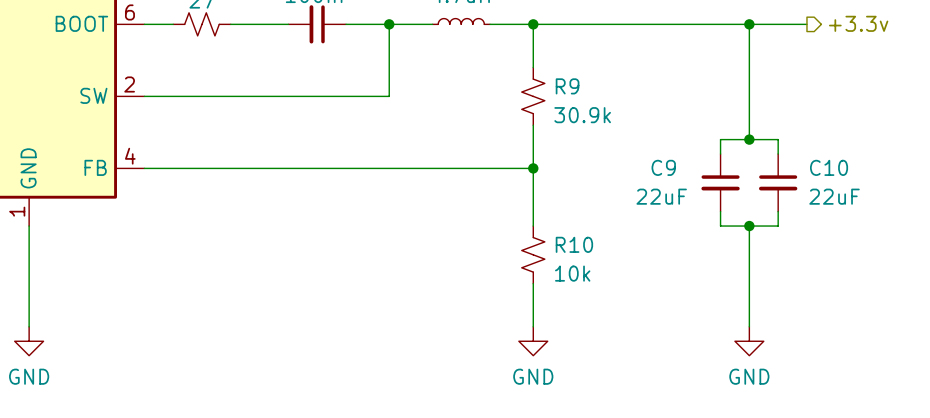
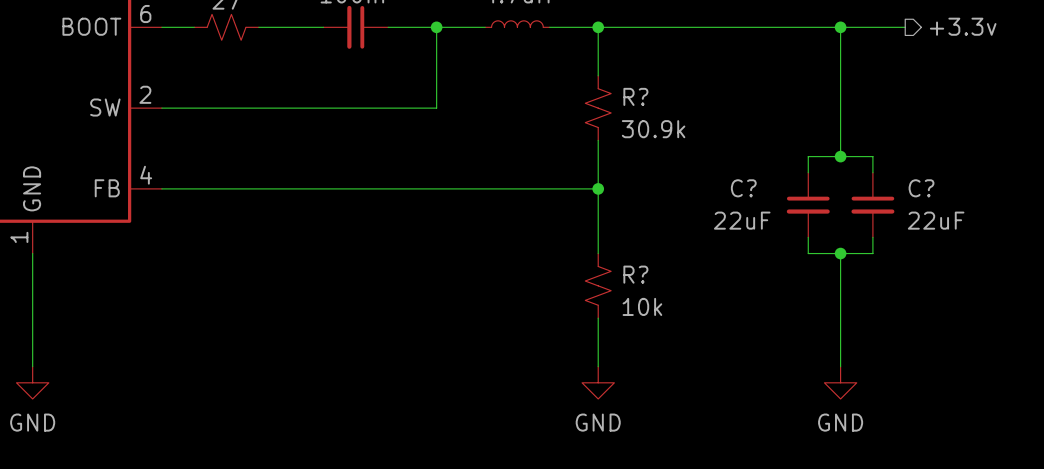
R9 name: R9 (567, 86) -> R? (635, 96)
C9 name: C9 (663, 167) -> C? (743, 188)
C10 name: C10 (829, 167) -> C? (921, 188)
R10 name: R10 (574, 244) -> R? (635, 274)

